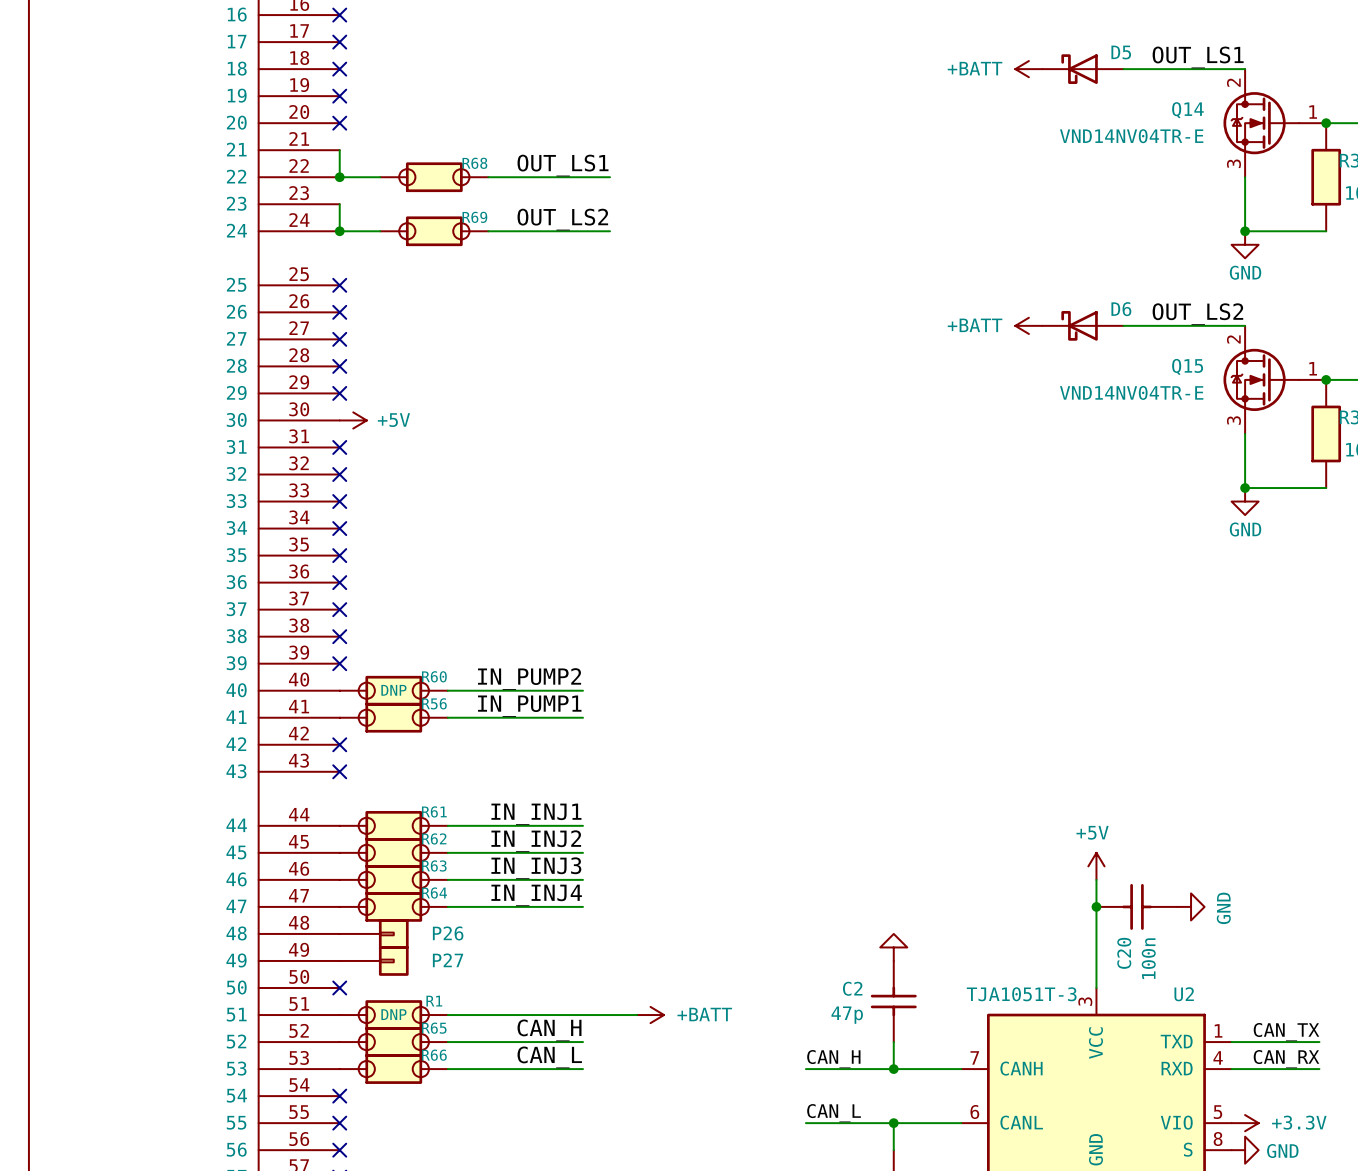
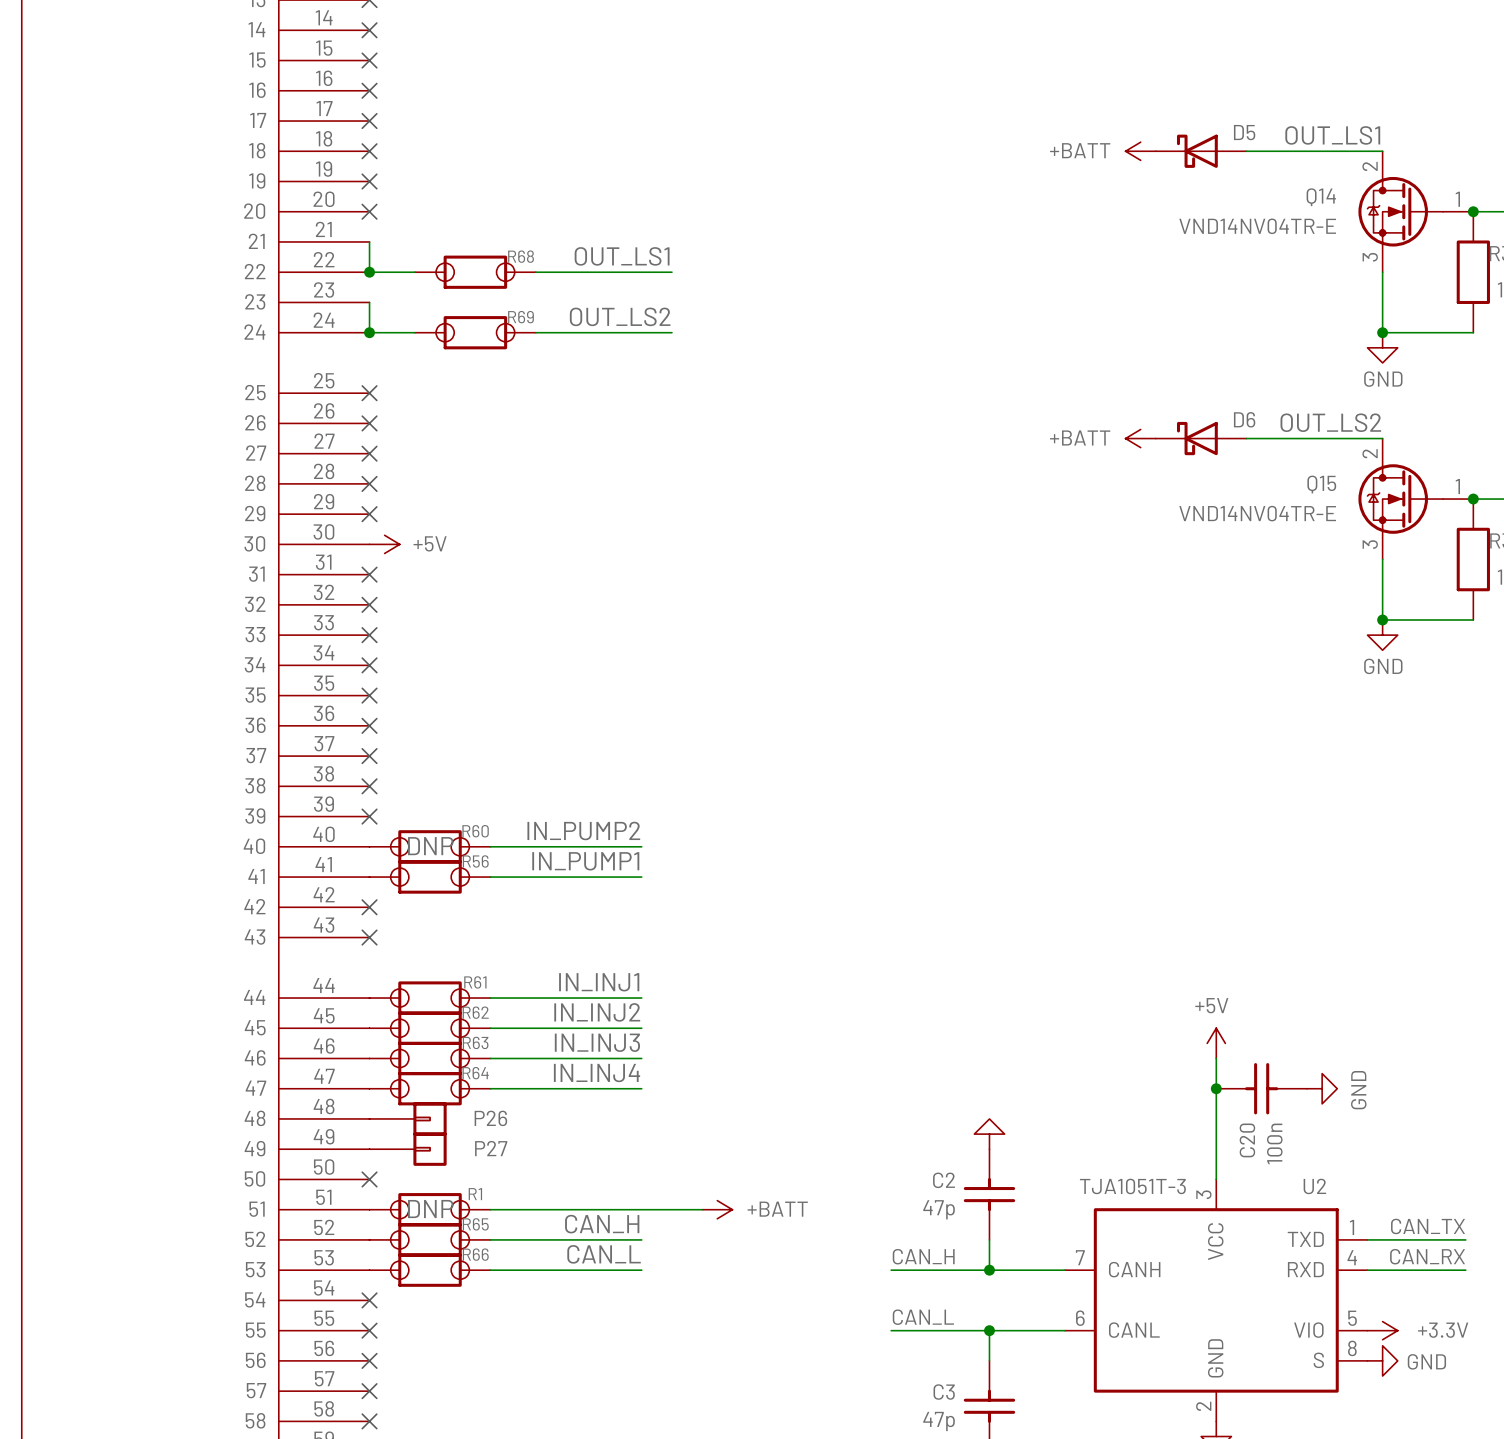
R60 value: DNP (393, 690) -> none
R60 text: none -> DNP (430, 846)
R1 value: DNP (393, 1014) -> none
R1 text: none -> DNP (430, 1209)

